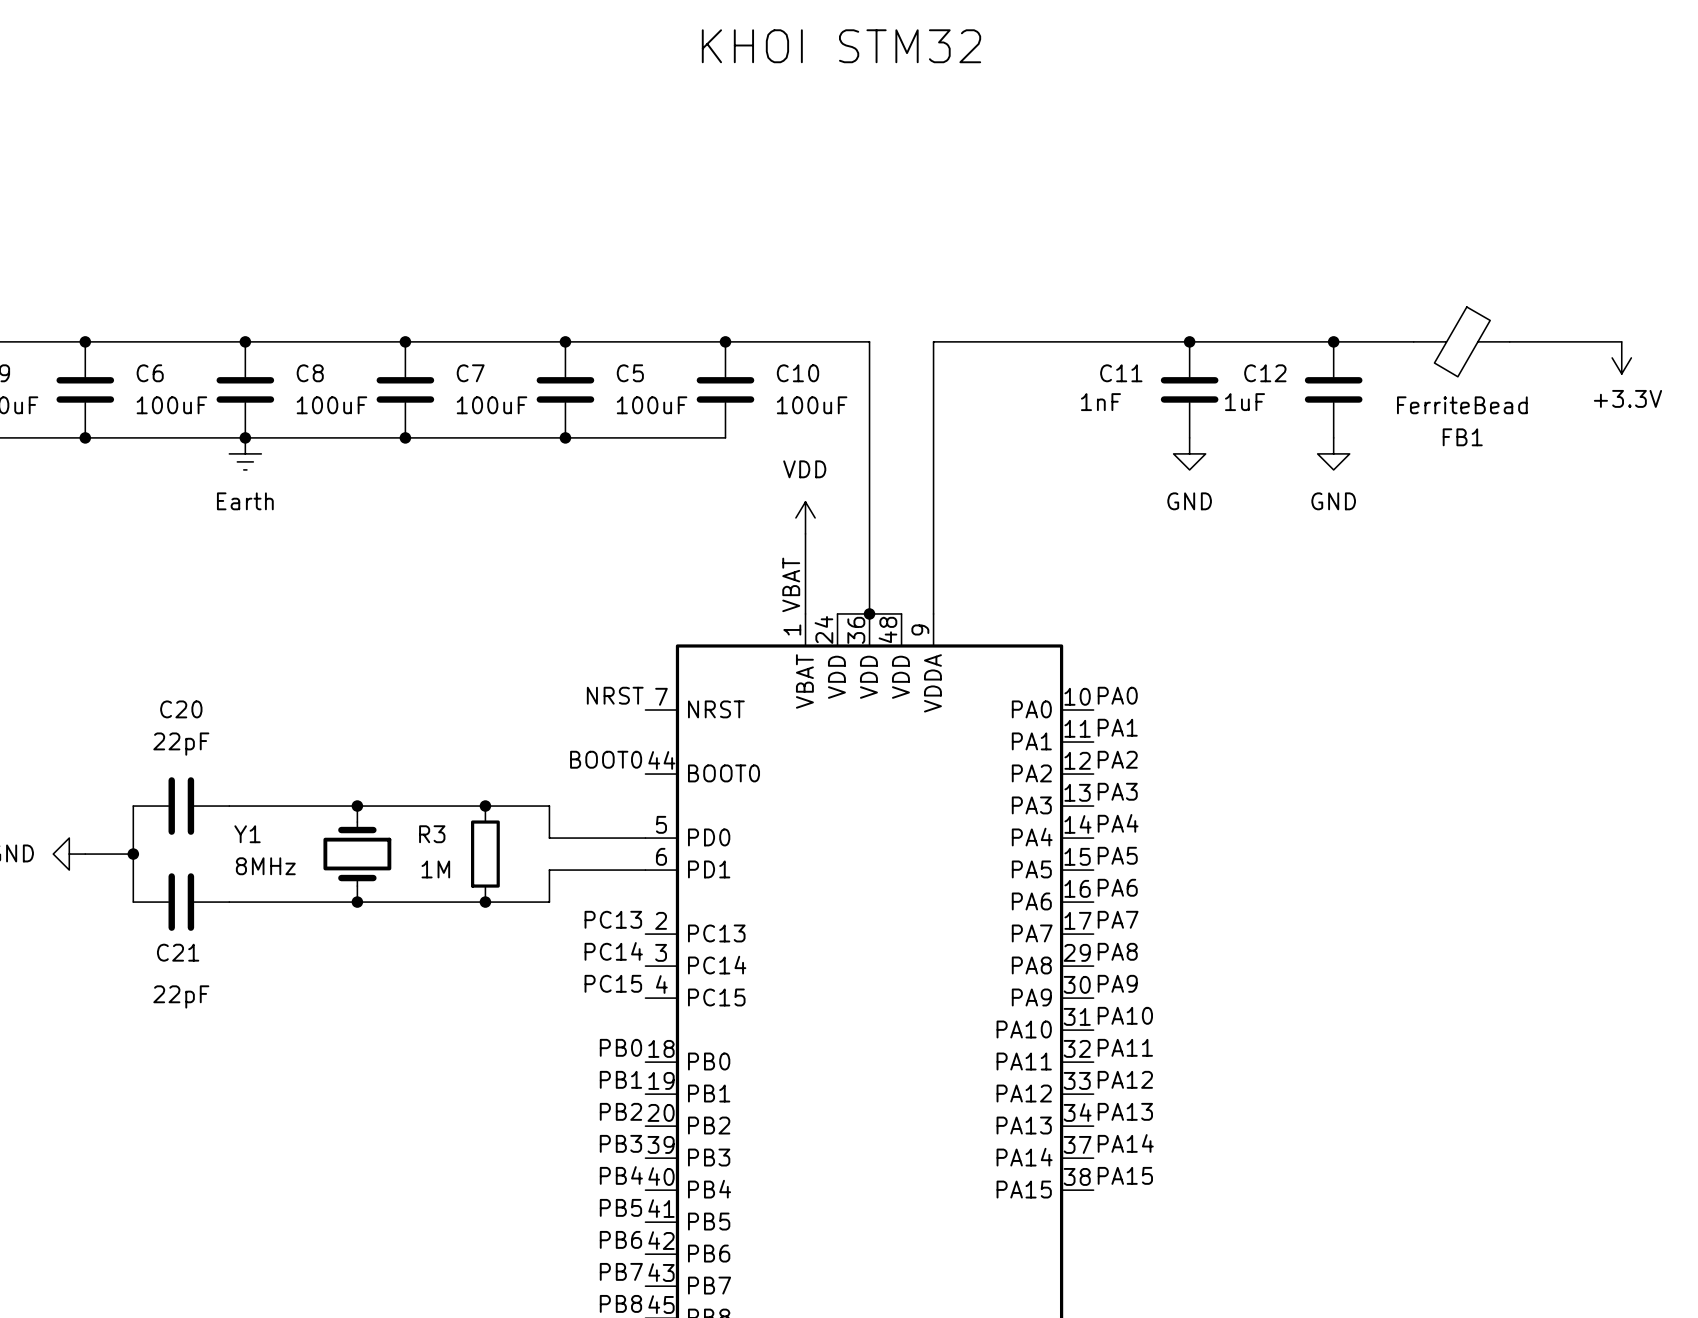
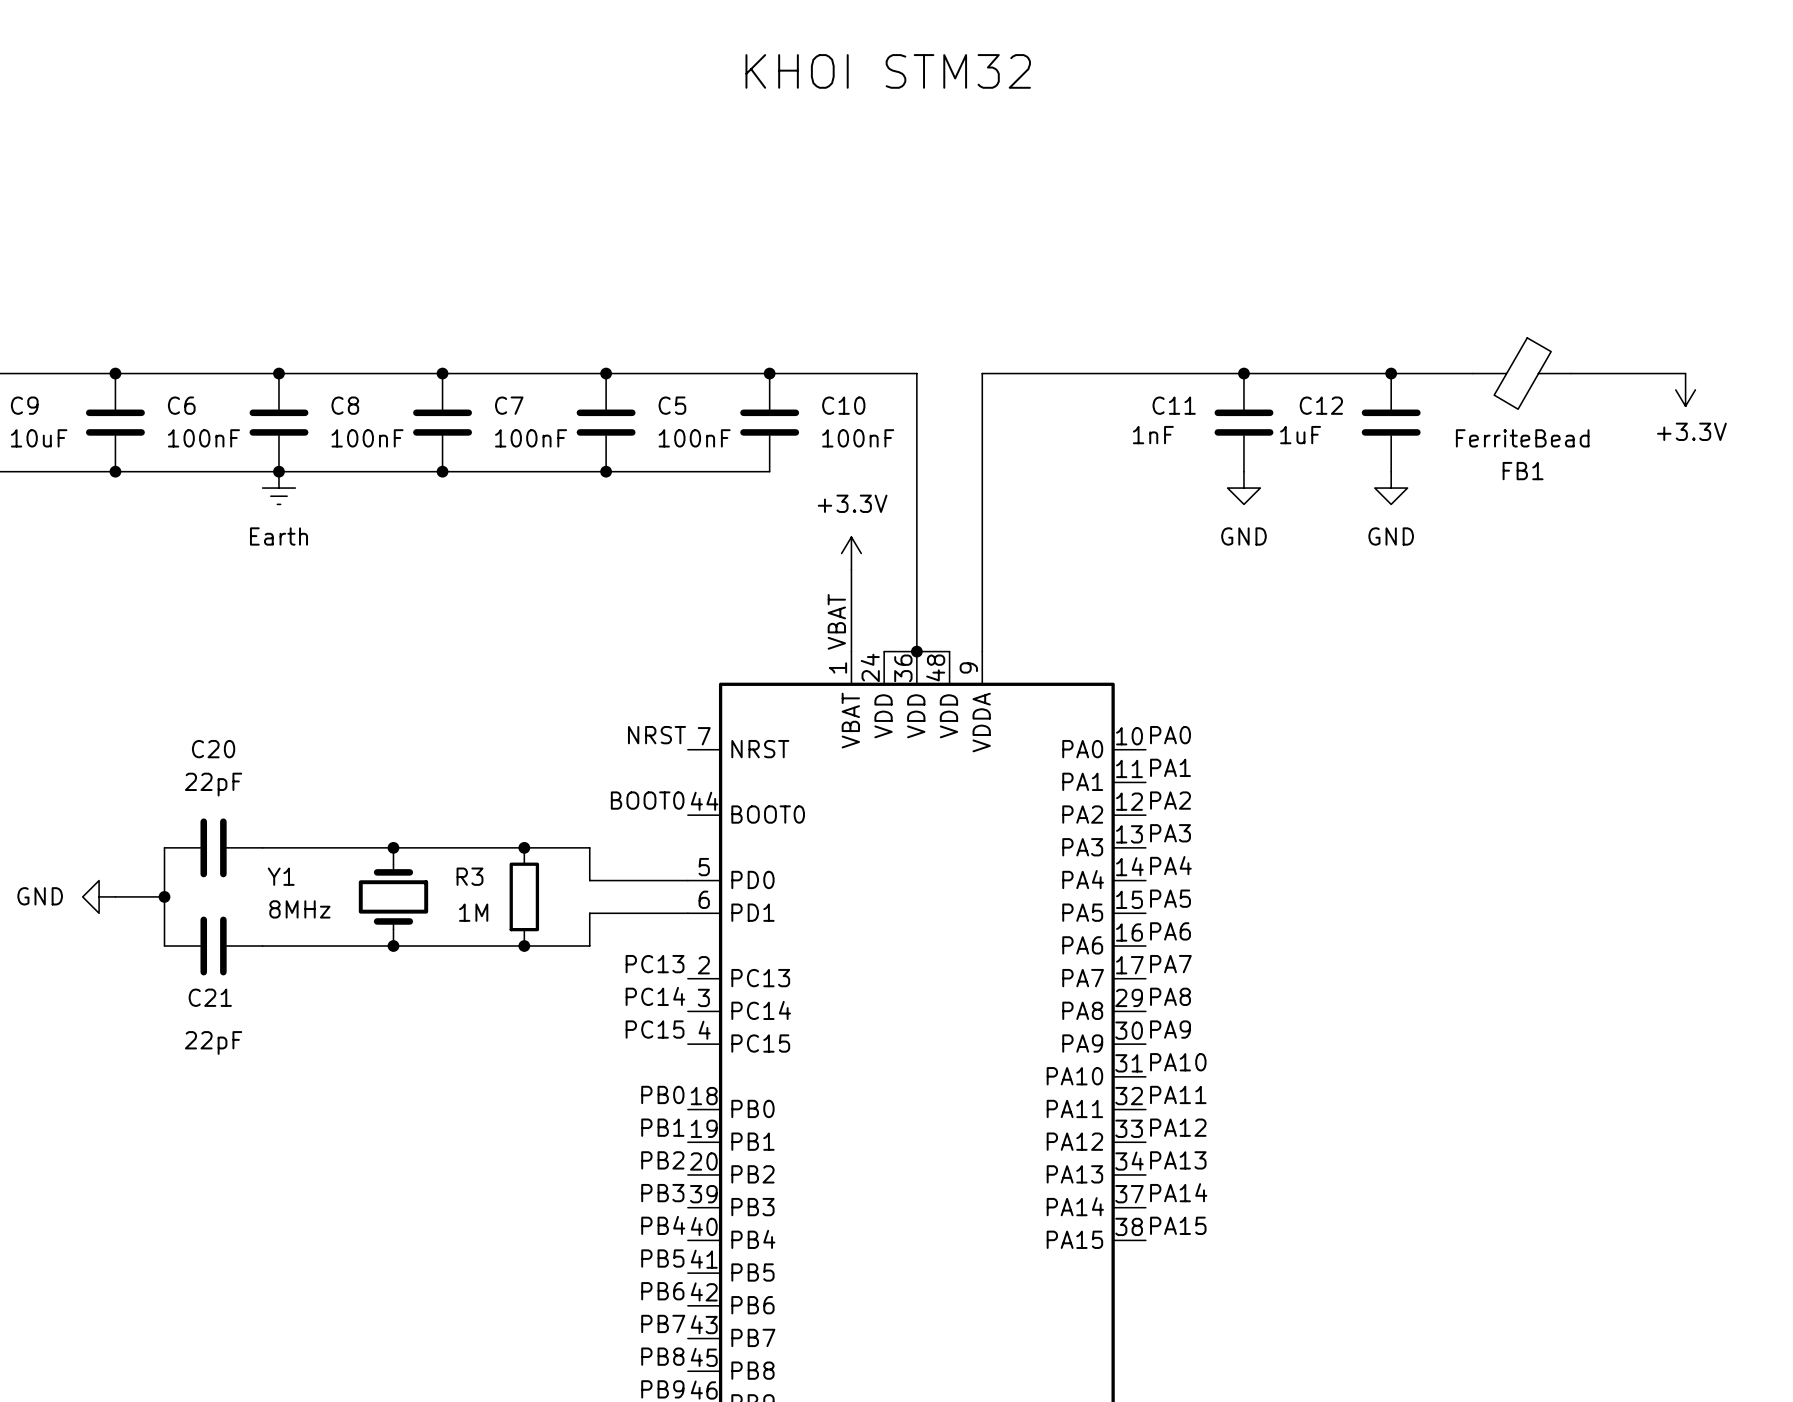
C6 value: 100uF (171, 405) -> 100nF (203, 438)
C8 value: 100uF (331, 405) -> 100nF (367, 438)
C7 value: 100uF (492, 405) -> 100nF (531, 438)
C5 value: 100uF (652, 405) -> 100nF (694, 438)
C10 value: 100uF (812, 405) -> 100nF (858, 438)
power symbol: VDD (805, 517) -> +3.3V (851, 553)

